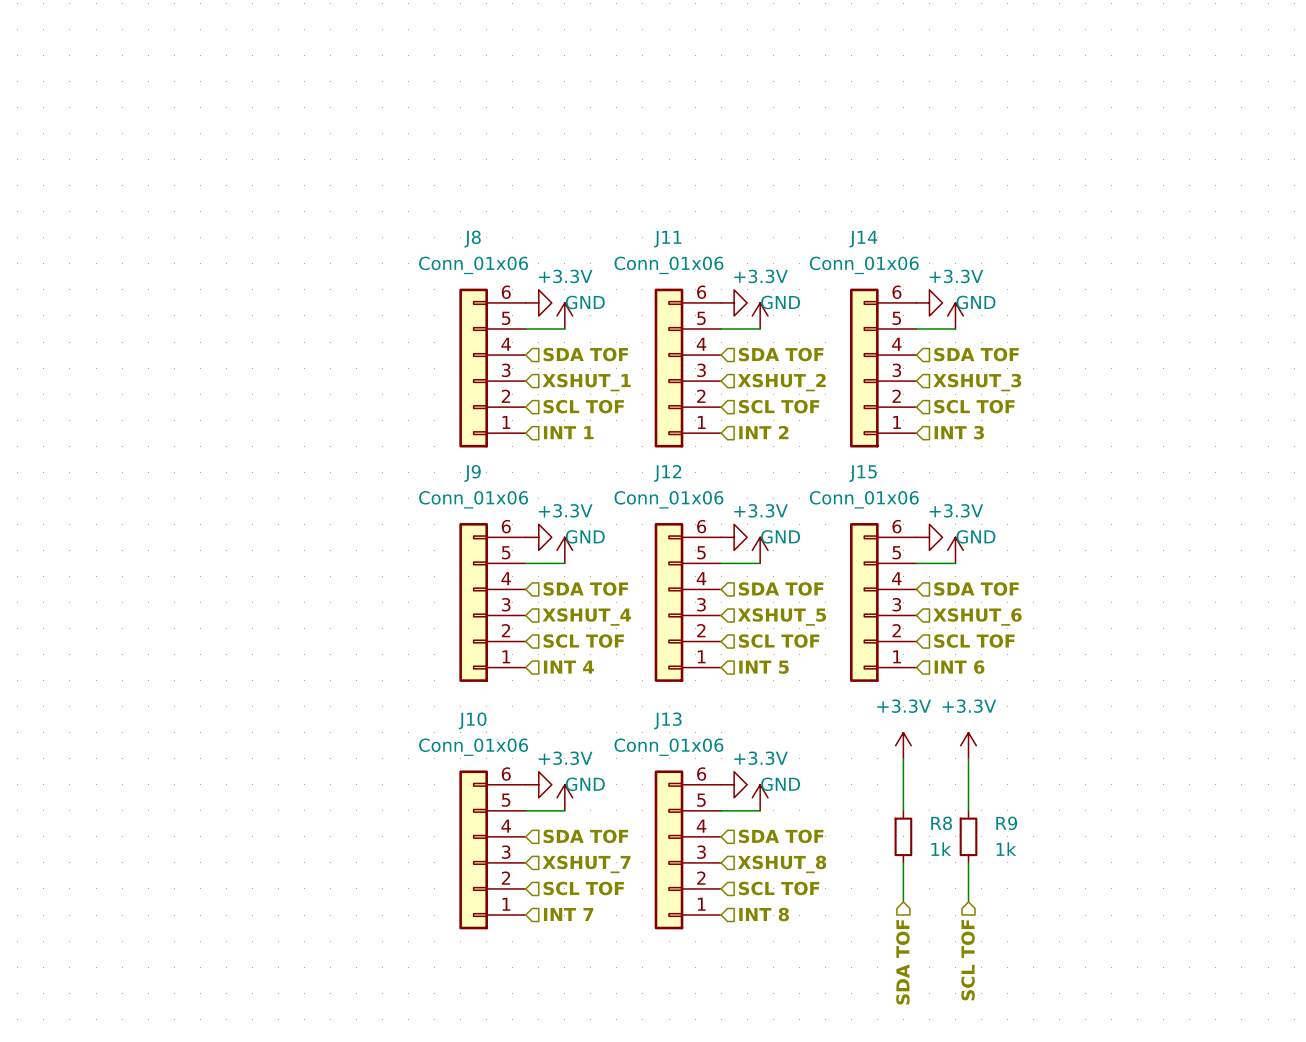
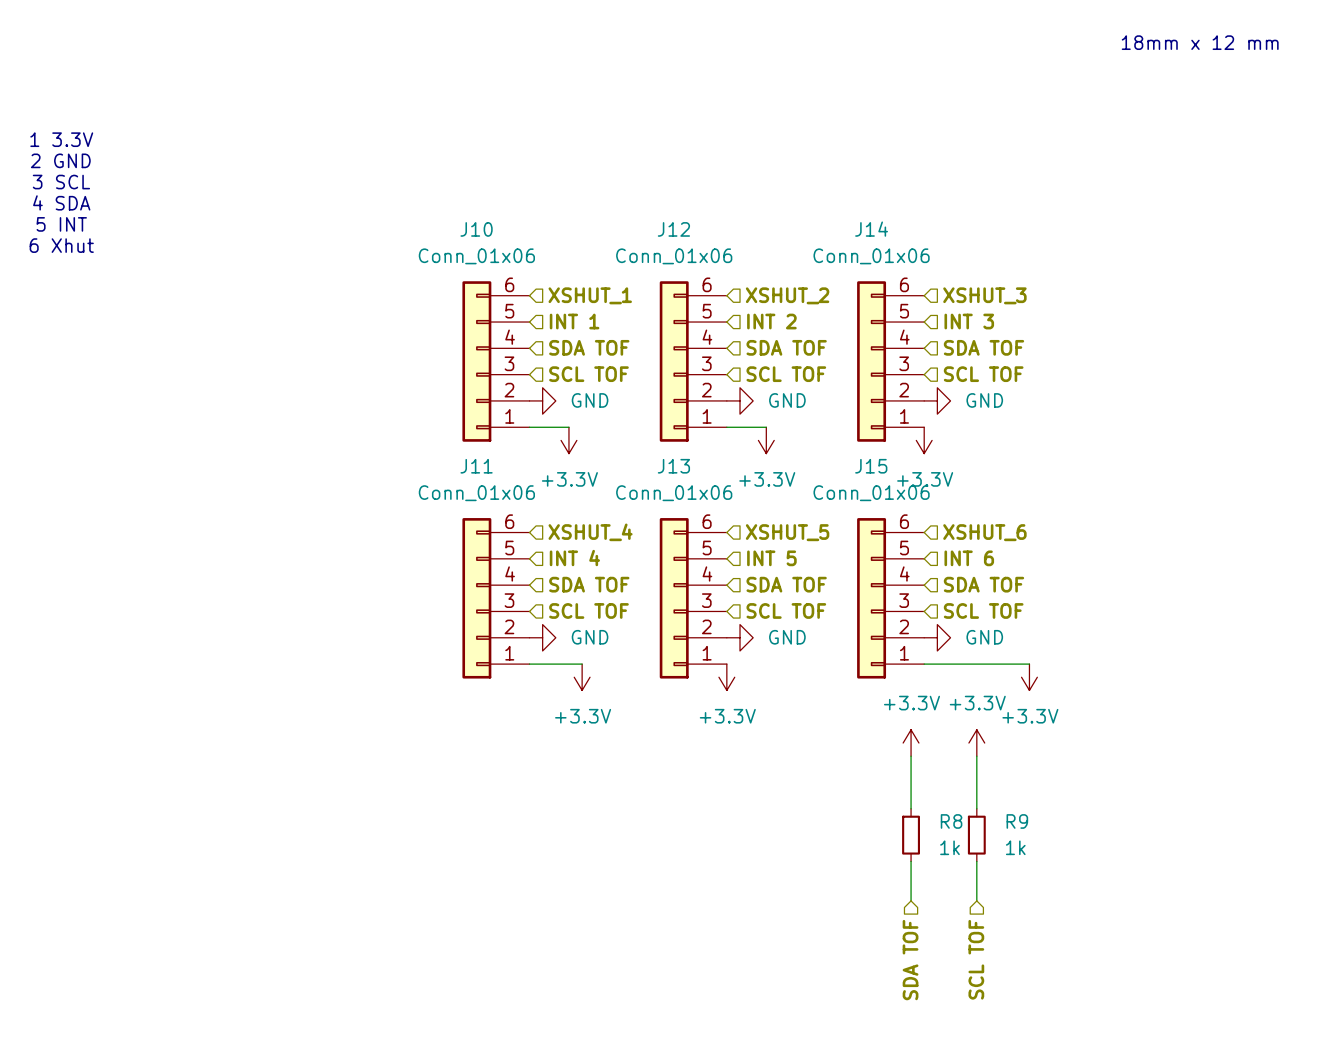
text: none -> 18mm x 12 mm (1200, 42)
text: none -> 1 3.3V (61, 139)
text: none -> 2 GND (60, 160)
text: none -> 3 SCL (61, 182)
text: none -> 4 SDA (61, 202)
text: none -> 5 INT (61, 224)
J8 name: J8 (472, 239) -> J10 (476, 229)
J11 name: J11 (667, 239) -> J12 (673, 229)
text: none -> 6 Xhut (61, 245)
power symbol: GND (538, 302) -> none
power symbol: GND (734, 302) -> none
power symbol: GND (929, 302) -> none
hierarchical label: none -> XSHUT_1 (590, 295)
hierarchical label: none -> XSHUT_2 (787, 295)
hierarchical label: none -> XSHUT_3 (984, 295)
power symbol: +3.3V (564, 315) -> none
power symbol: +3.3V (760, 315) -> none
power symbol: +3.3V (955, 315) -> none
wire: (525, 328) (564, 328) -> (529, 427) (568, 427)
wire: (721, 328) (760, 328) -> (726, 427) (766, 427)
wire: (916, 328) (955, 328) -> none
hierarchical label: XSHUT_1 (586, 382) -> SCL TOF (588, 374)
hierarchical label: XSHUT_2 (781, 382) -> SCL TOF (786, 374)
hierarchical label: XSHUT_3 (977, 382) -> SCL TOF (983, 374)
hierarchical label: SCL TOF (583, 406) -> none
hierarchical label: SCL TOF (779, 406) -> none
hierarchical label: SCL TOF (974, 406) -> none
power symbol: none -> GND (542, 400)
power symbol: none -> GND (740, 400)
power symbol: none -> GND (937, 400)
hierarchical label position: INT 1 (568, 432) -> INT 1 (574, 321)
hierarchical label position: INT 2 (763, 432) -> INT 2 (771, 321)
hierarchical label position: INT 3 (959, 432) -> INT 3 (969, 321)
power symbol: none -> +3.3V (568, 440)
power symbol: none -> +3.3V (766, 440)
power symbol: none -> +3.3V (924, 440)
J9 name: J9 (472, 473) -> J11 (476, 466)
J12 name: J12 (667, 473) -> J13 (673, 466)
power symbol: GND (538, 537) -> none
power symbol: GND (734, 537) -> none
power symbol: GND (929, 537) -> none
hierarchical label: none -> XSHUT_4 (590, 532)
hierarchical label: none -> XSHUT_5 (787, 532)
hierarchical label: none -> XSHUT_6 (984, 532)
power symbol: +3.3V (564, 550) -> none
power symbol: +3.3V (760, 550) -> none
power symbol: +3.3V (955, 550) -> none
wire: (525, 563) (564, 563) -> none
wire: (721, 563) (760, 563) -> none
wire: (916, 563) (955, 563) -> none
hierarchical label: XSHUT_4 (586, 616) -> SCL TOF (588, 610)
hierarchical label: XSHUT_5 (781, 616) -> SCL TOF (786, 610)
hierarchical label: XSHUT_6 (977, 616) -> SCL TOF (983, 610)
power symbol: none -> GND (542, 637)
hierarchical label: SCL TOF (583, 641) -> none
power symbol: none -> GND (740, 637)
hierarchical label: SCL TOF (779, 641) -> none
power symbol: none -> GND (937, 637)
hierarchical label: SCL TOF (974, 641) -> none
wire: none -> (529, 664) (582, 664)
hierarchical label position: INT 4 (568, 667) -> INT 4 (574, 558)
hierarchical label position: INT 5 (764, 667) -> INT 5 (771, 558)
wire: none -> (924, 664) (1029, 664)
hierarchical label position: INT 6 (959, 667) -> INT 6 (969, 558)
power symbol: none -> +3.3V (582, 677)
power symbol: none -> +3.3V (726, 677)
power symbol: none -> +3.3V (1029, 677)
power symbol: GND (538, 784) -> none
power symbol: GND (734, 784) -> none
power symbol: +3.3V (564, 797) -> none
power symbol: +3.3V (760, 797) -> none
wire: (525, 810) (564, 810) -> none
wire: (721, 810) (760, 810) -> none
hierarchical label: SDA TOF (585, 836) -> none
hierarchical label: SDA TOF (781, 836) -> none
J10: Conn_01x06 (492, 849) -> none
J13: Conn_01x06 (687, 849) -> none
hierarchical label: XSHUT_7 (586, 864) -> none
hierarchical label: XSHUT_8 (782, 864) -> none
hierarchical label: SCL TOF (583, 888) -> none
hierarchical label: SCL TOF (779, 888) -> none
hierarchical label: INT 7 (568, 914) -> none
hierarchical label: INT 8 (764, 914) -> none

